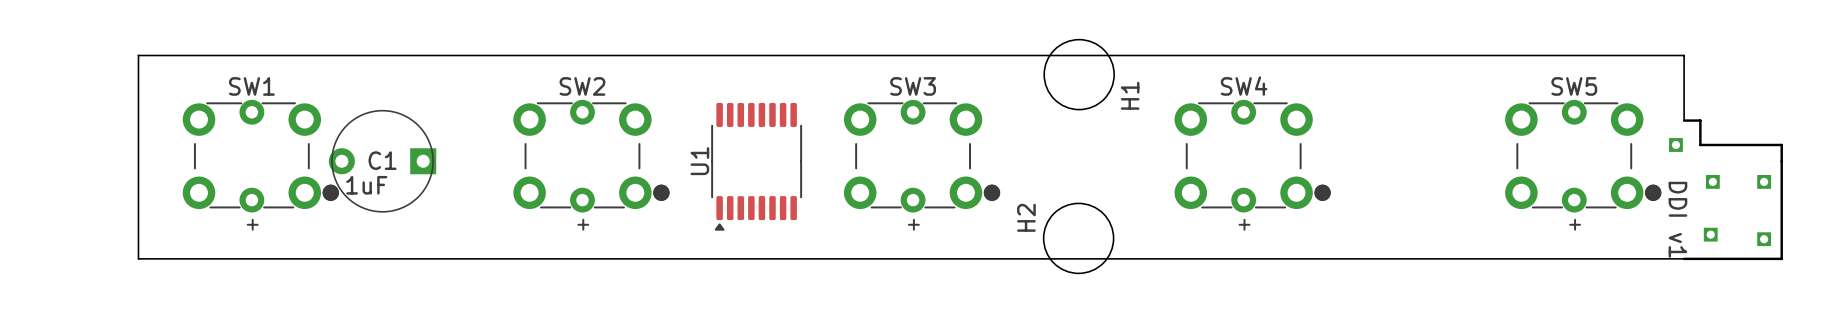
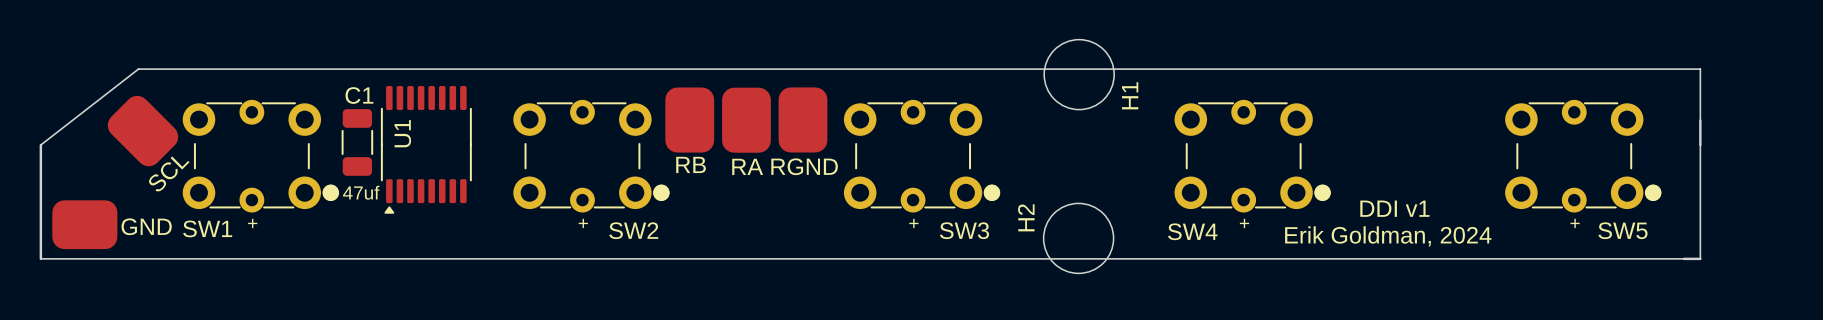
SW1 name position: SW1 (251, 86) -> SW1 (207, 228)
SW2 name position: SW2 (582, 86) -> SW2 (633, 230)
SW3 name position: SW3 (913, 86) -> SW3 (964, 230)
SW4 name position: SW4 (1244, 86) -> SW4 (1192, 231)
SW5 name position: SW5 (1574, 86) -> SW5 (1622, 230)
C1 footprint: [328, 109, 437, 213] -> [341, 109, 374, 176]
part: none -> RGND (802, 119)
part: none -> RB (689, 120)
part: none -> RA (746, 120)
board edge: (1700, 120) (1684, 120) (1684, 55) (138, 55) (138, 258) -> (1700, 120) (1700, 69) (138, 69) (40, 144) (40, 258) (138, 258)
part: none -> SCL (142, 131)
part: (1675, 144) -> none
board edge: (1700, 144) (1781, 144) (1781, 258) (1700, 258) -> (1700, 144) (1700, 258)
C1 name position: C1 (382, 160) -> C1 (359, 95)
U1 name position: U1 (699, 161) -> U1 (402, 133)
U1 position: (756, 166) -> (426, 149)
part: (1712, 181) -> none
part: (1764, 181) -> none
text: 1uF (366, 185) -> none
C1 value: none -> 47uf (361, 192)
text rotation: 0° (1677, 219) -> 90° counterclockwise (1394, 208)
text position: DDI v1 (1677, 219) -> DDI v1 (1394, 208)
part: none -> GND (84, 224)
part: (1710, 234) -> none
text: none -> Erik Goldman, 2024 (1388, 236)
part: (1764, 239) -> none

